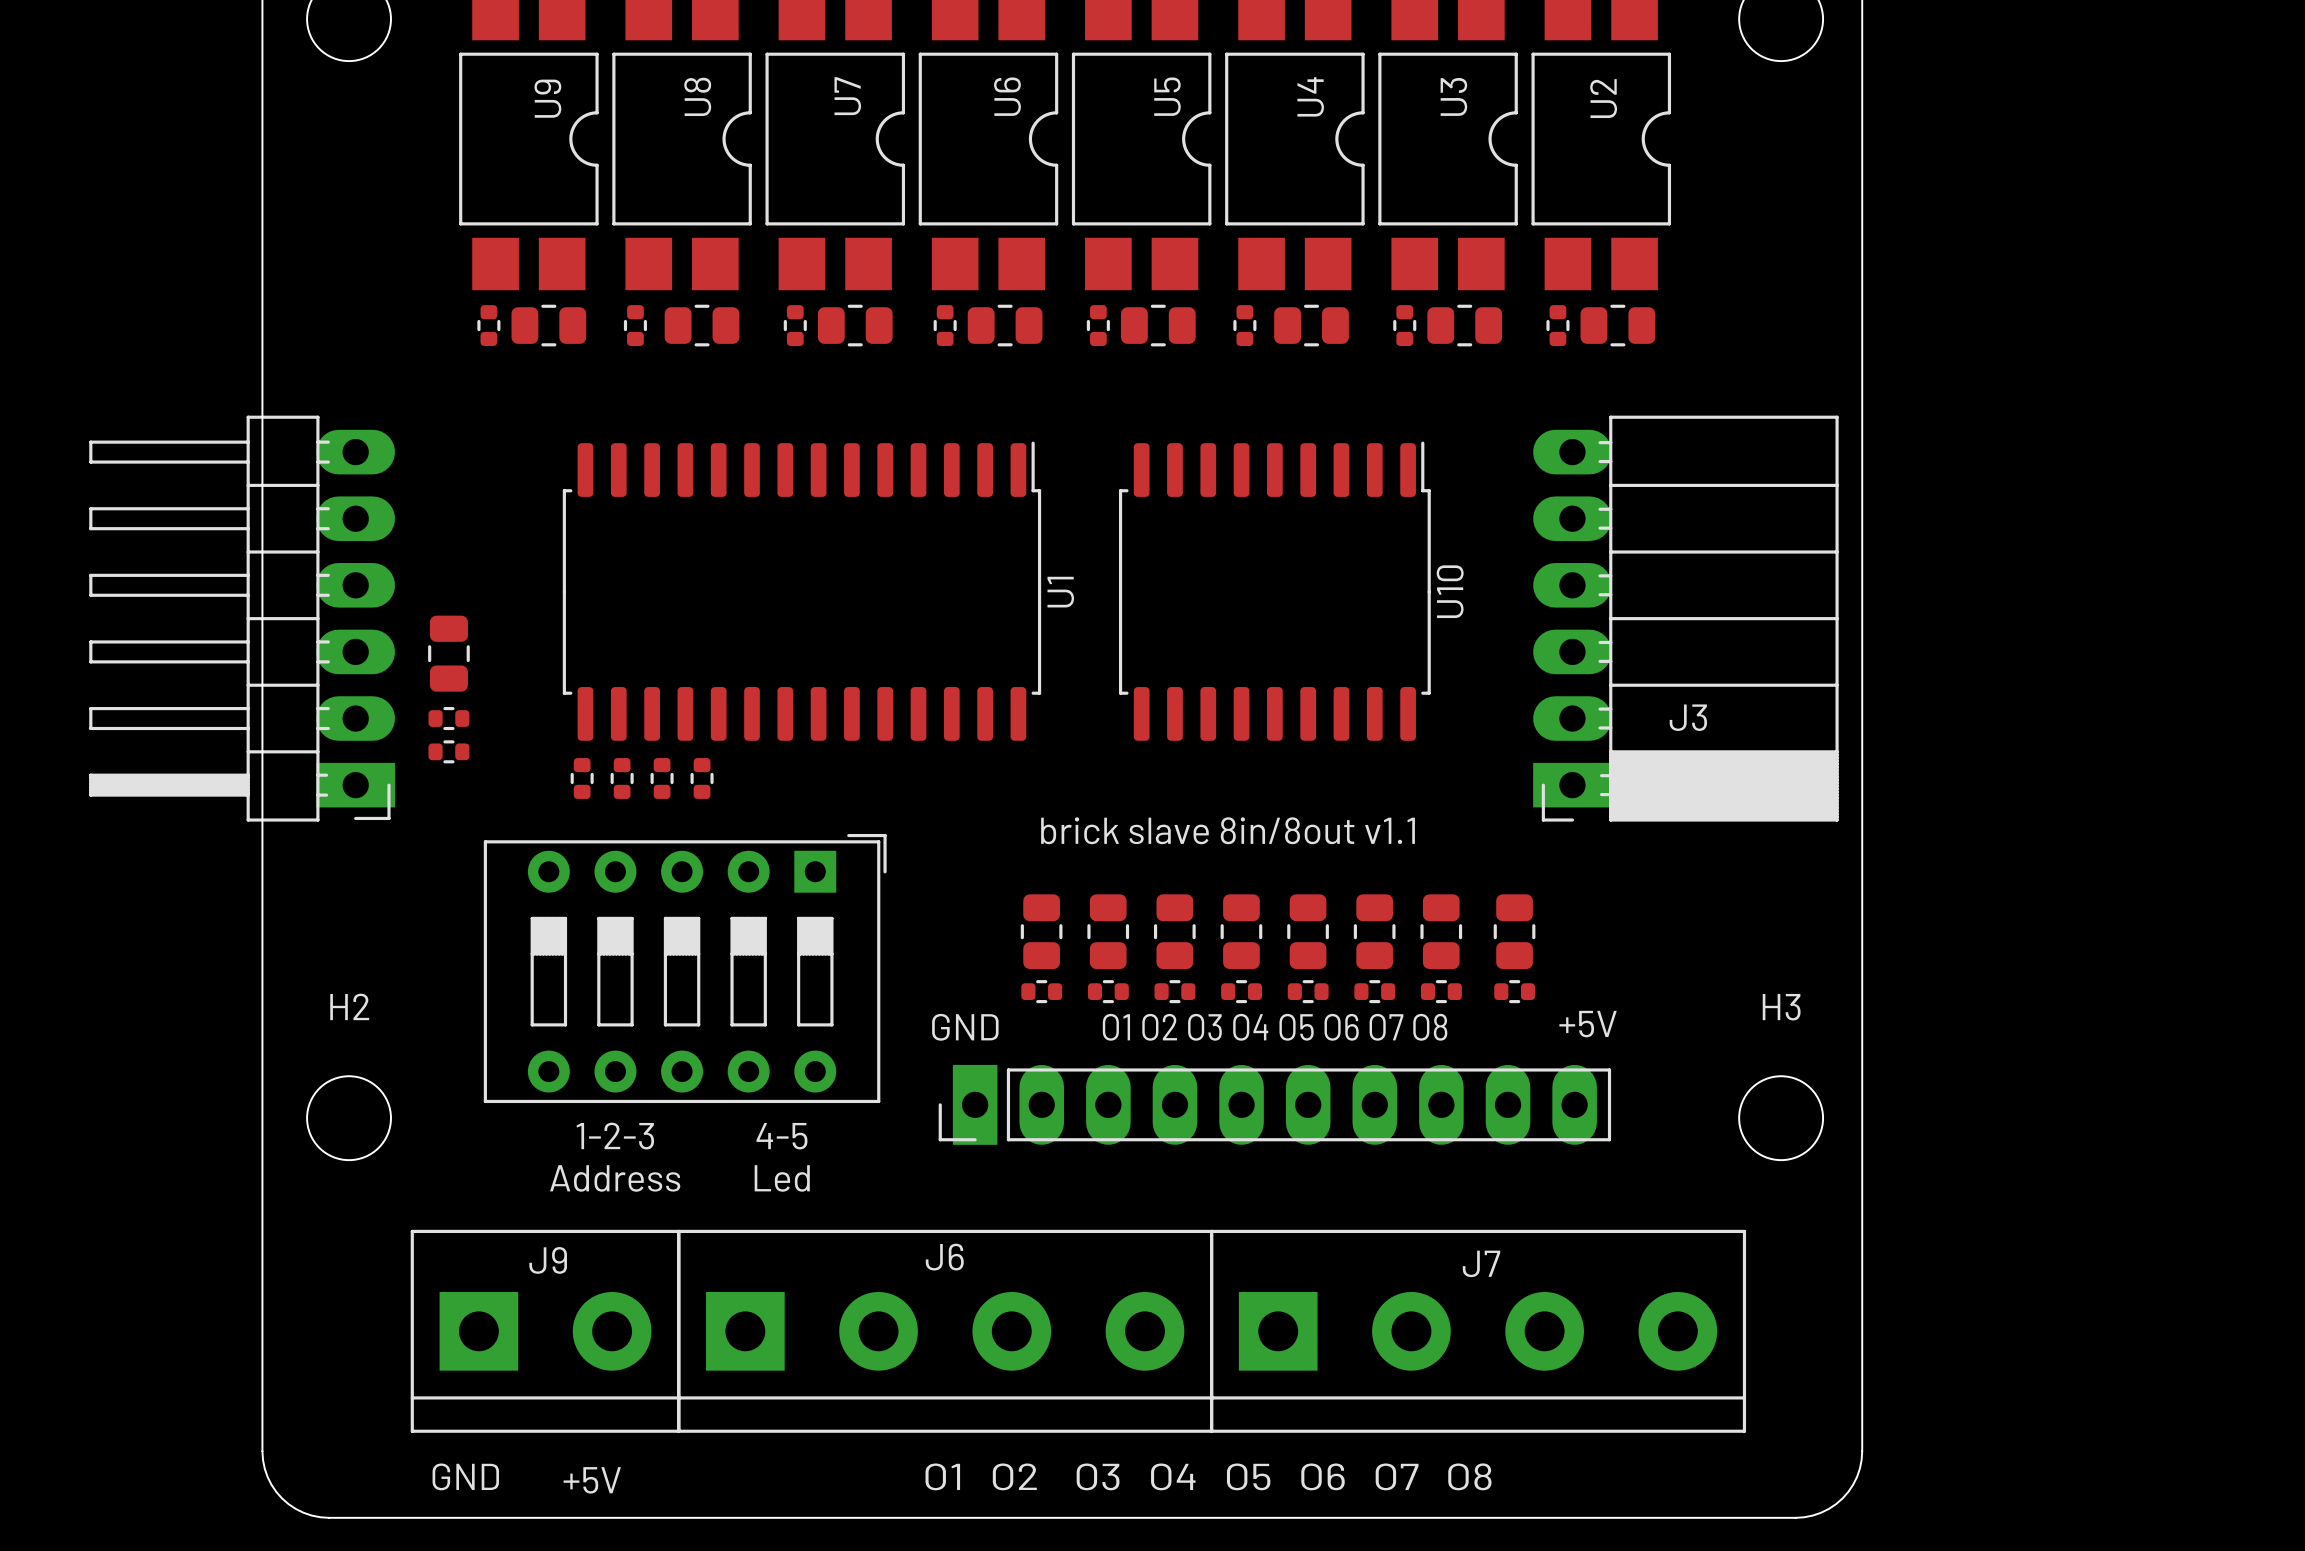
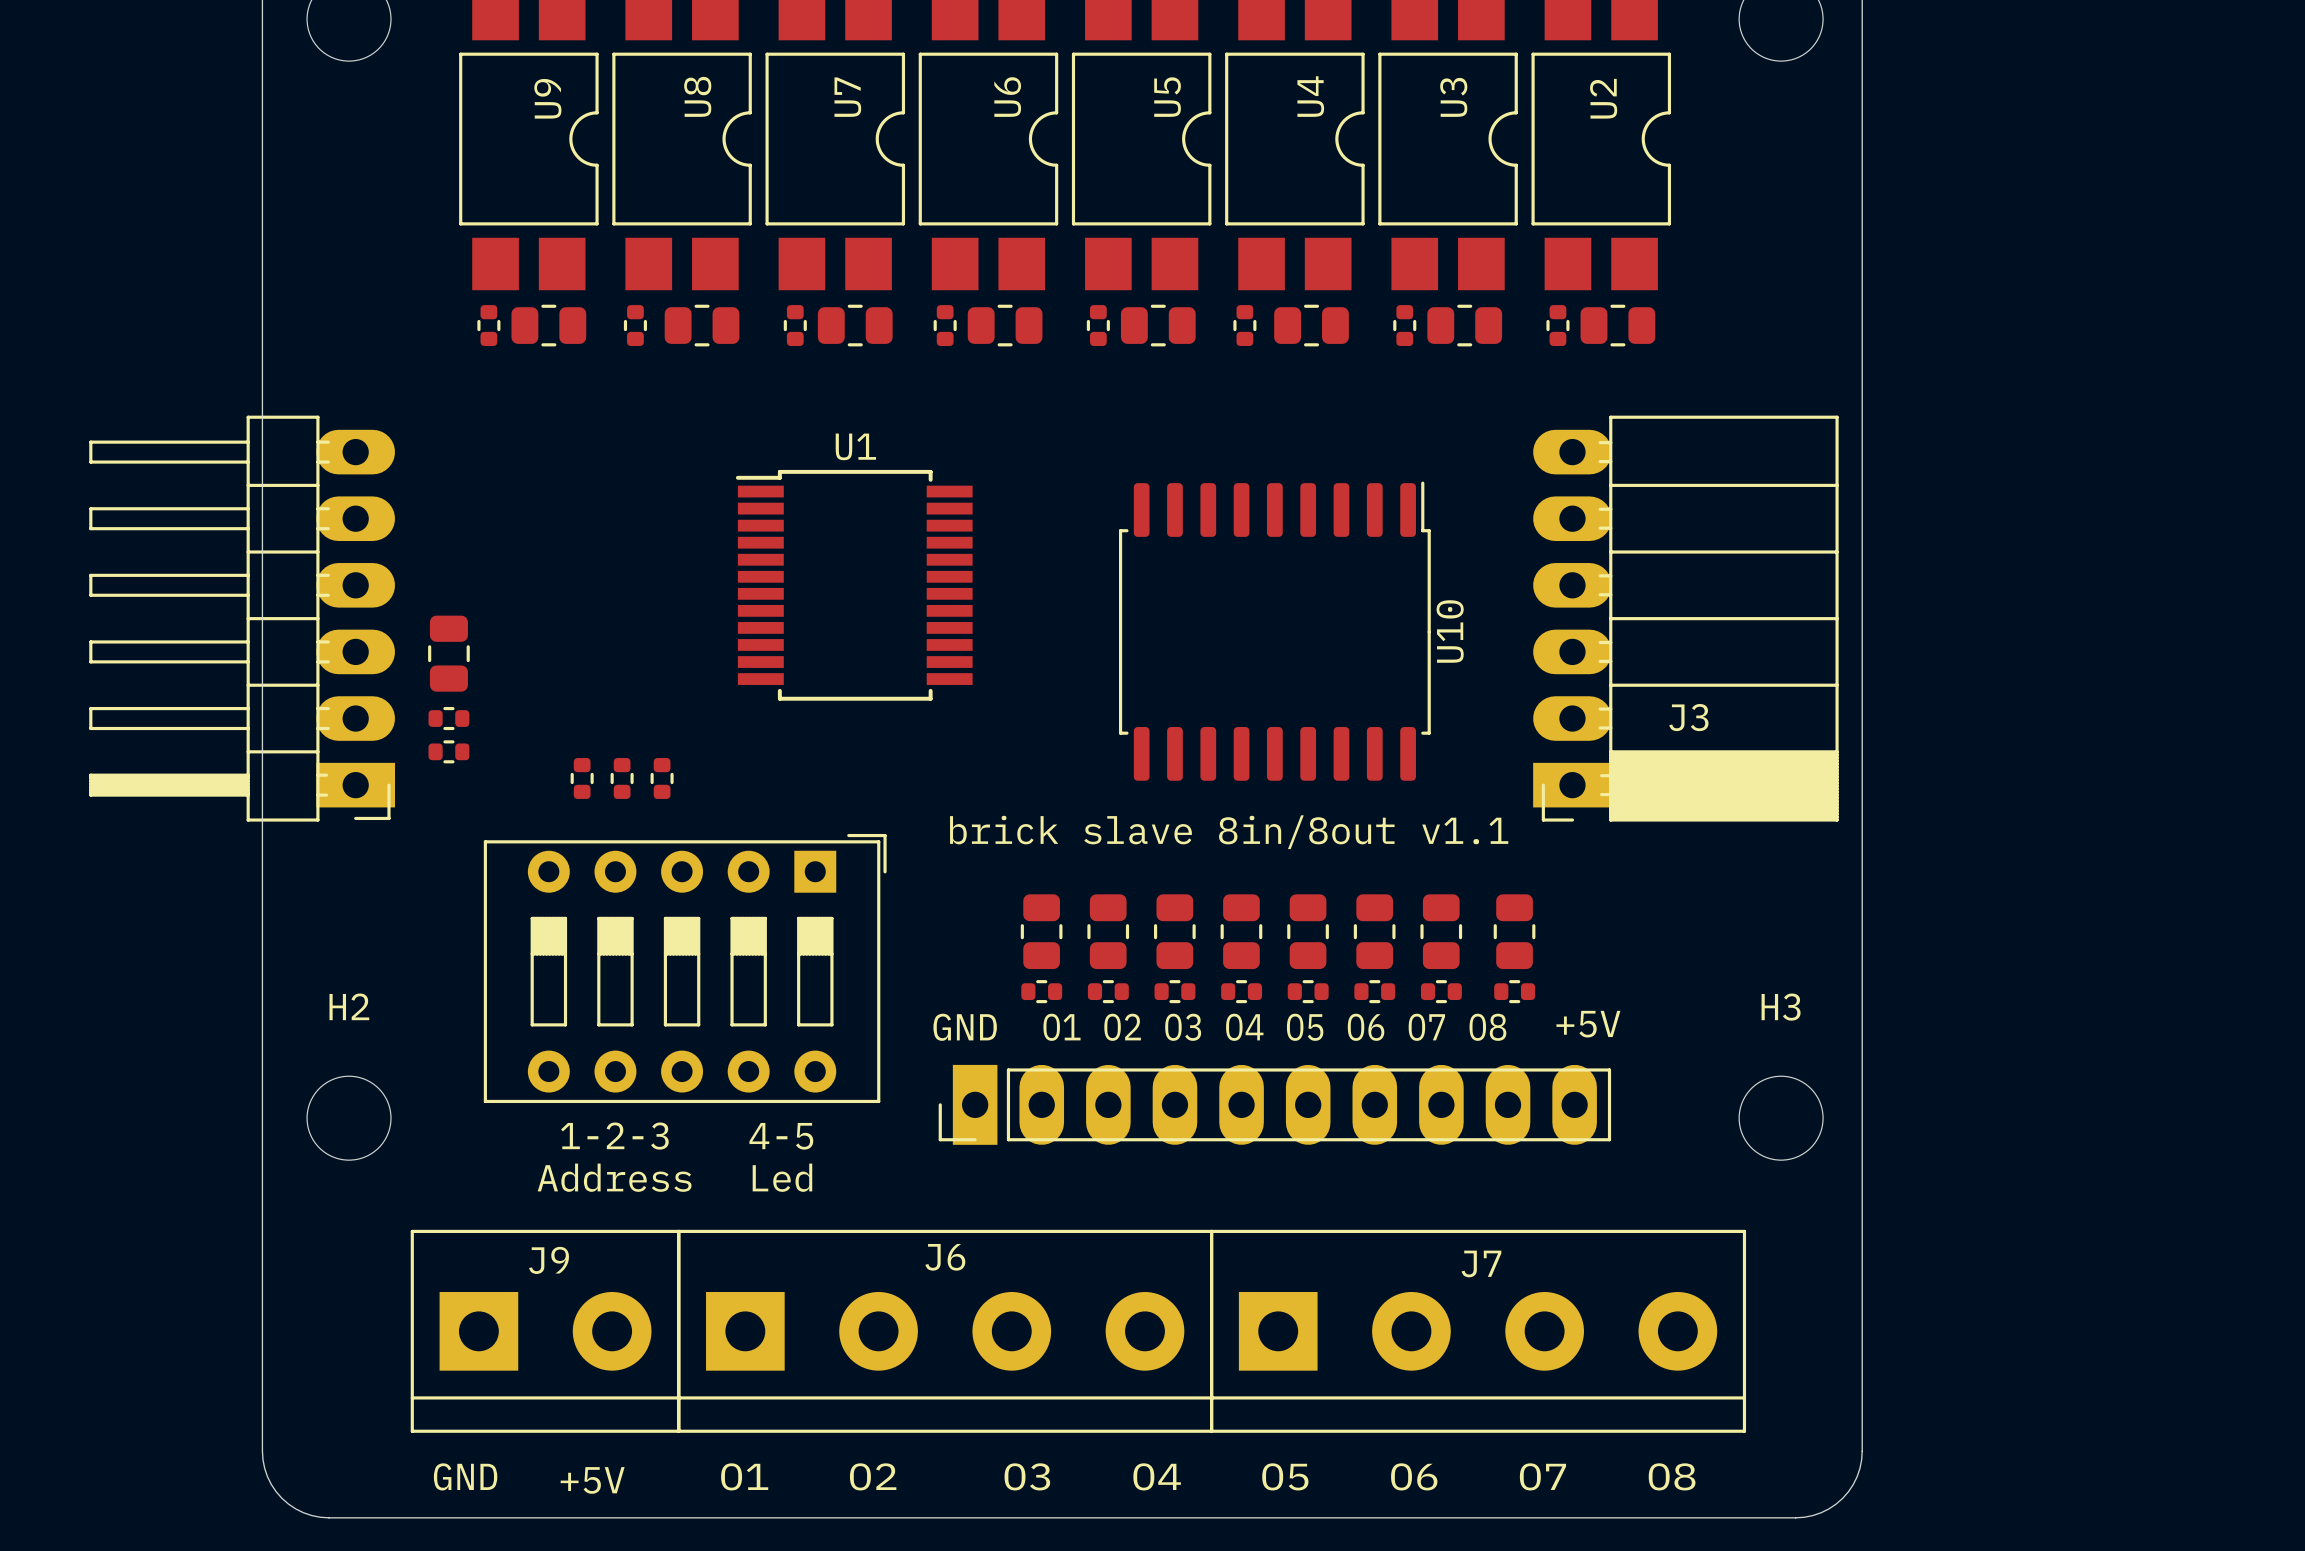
U1 footprint: [562, 441, 1042, 741] -> [735, 469, 973, 701]
U10 position: (1274, 591) -> (1274, 631)
U1 name position: U1 (1060, 592) -> U1 (855, 446)
part: (702, 778) -> none

